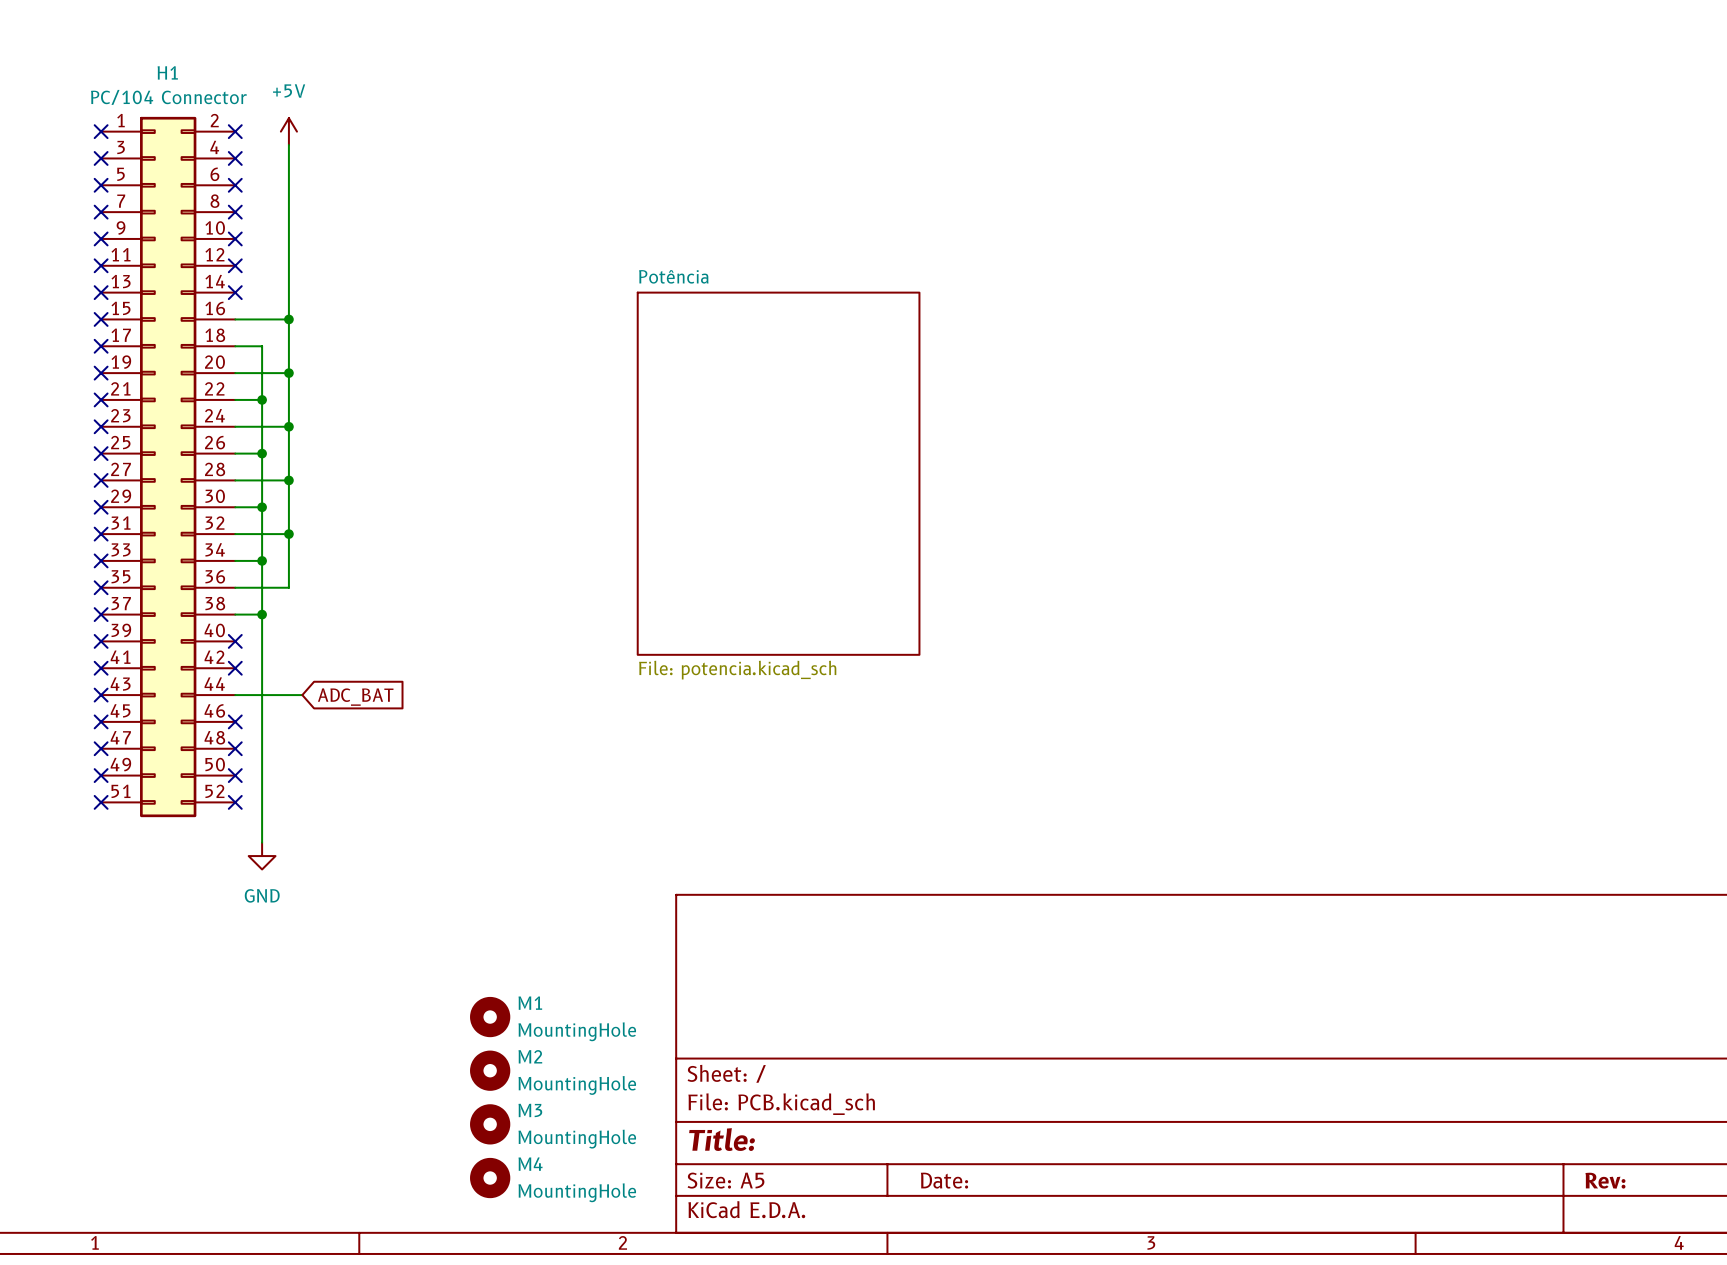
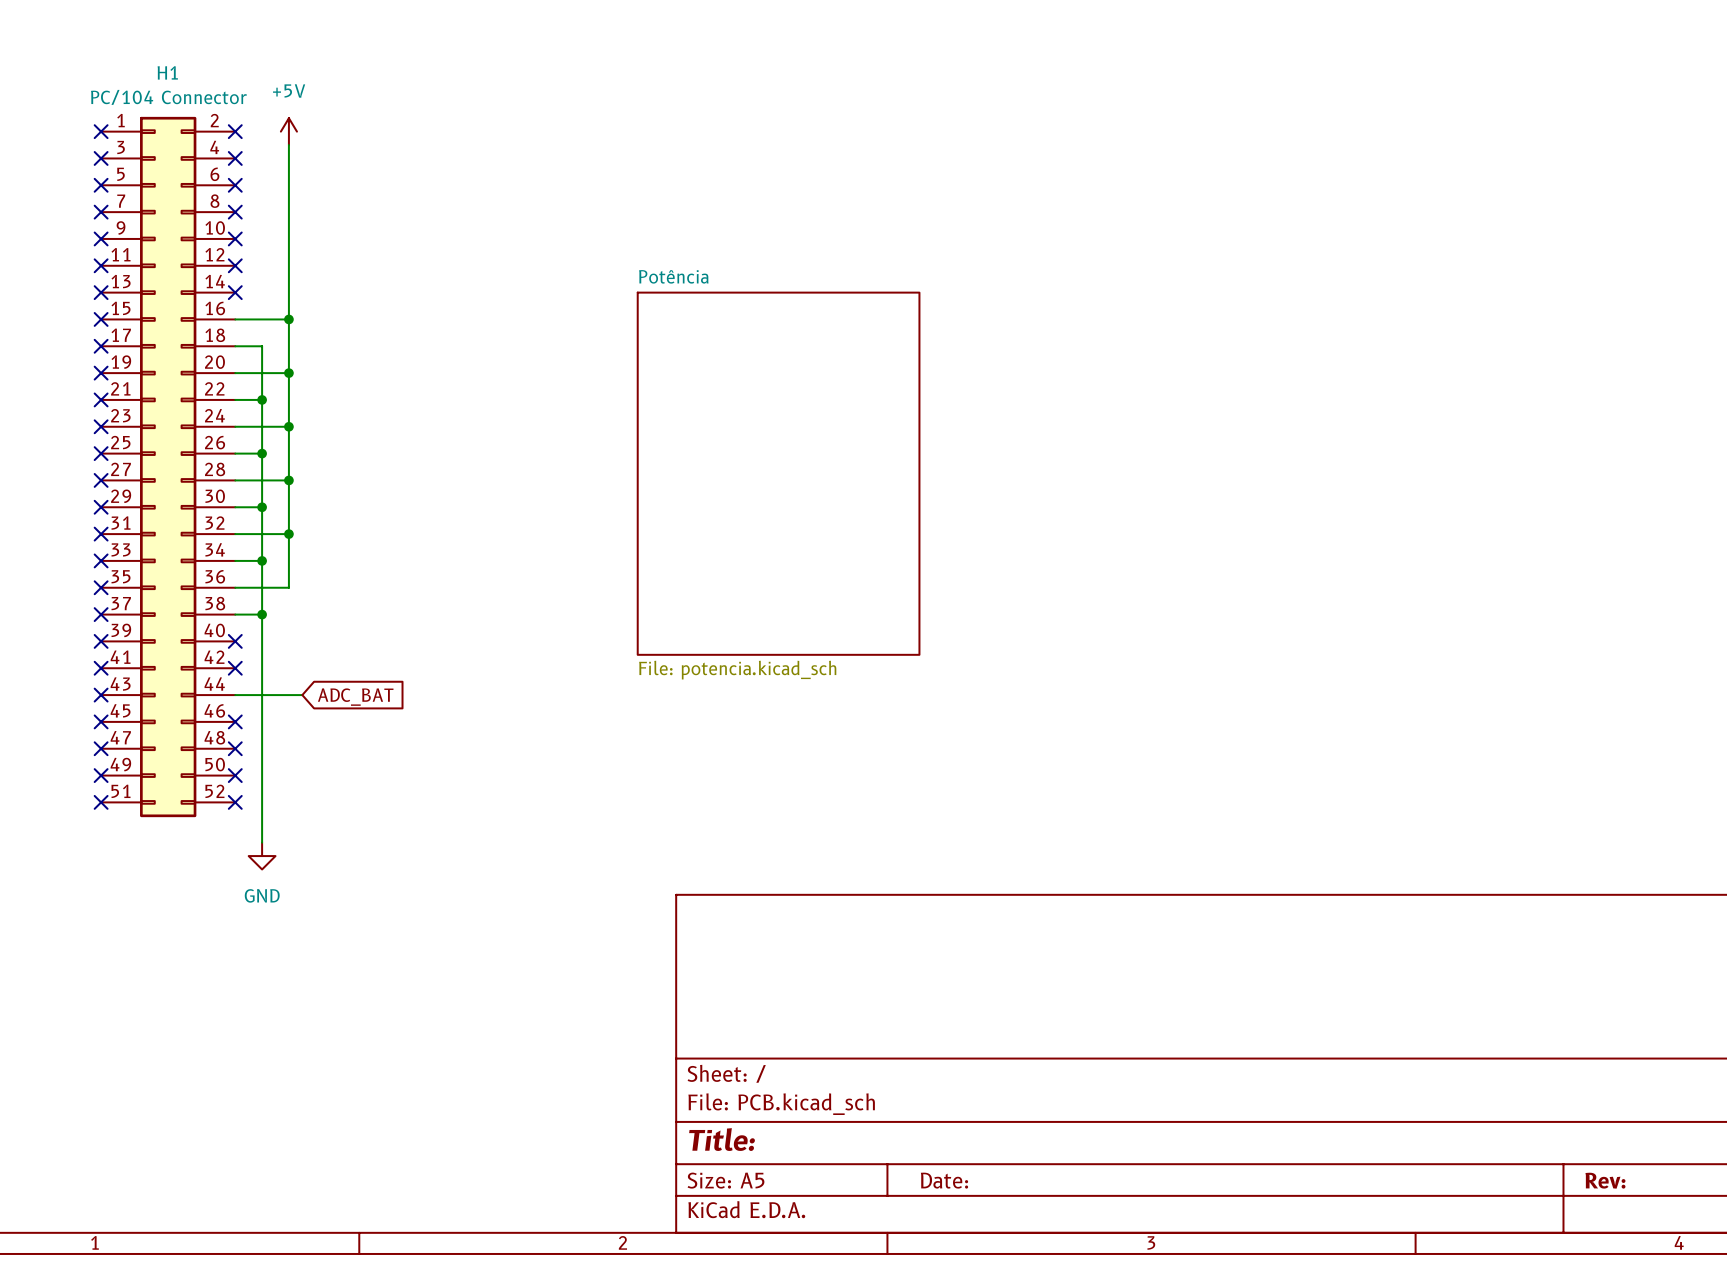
M1: MountingHole (490, 1017) -> none
M2: MountingHole (490, 1070) -> none
M3: MountingHole (490, 1124) -> none
M4: MountingHole (490, 1178) -> none

